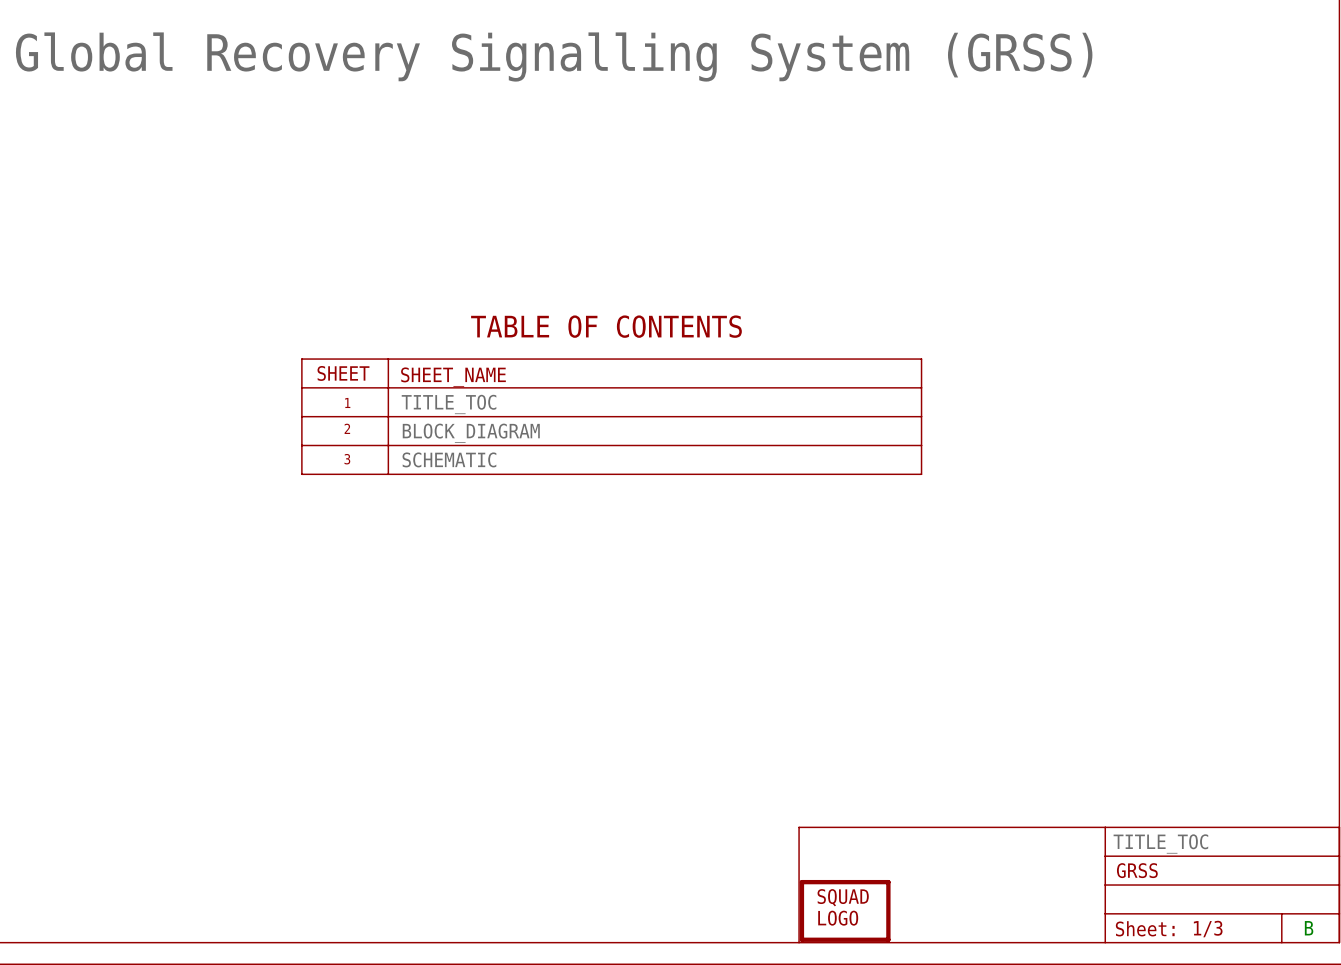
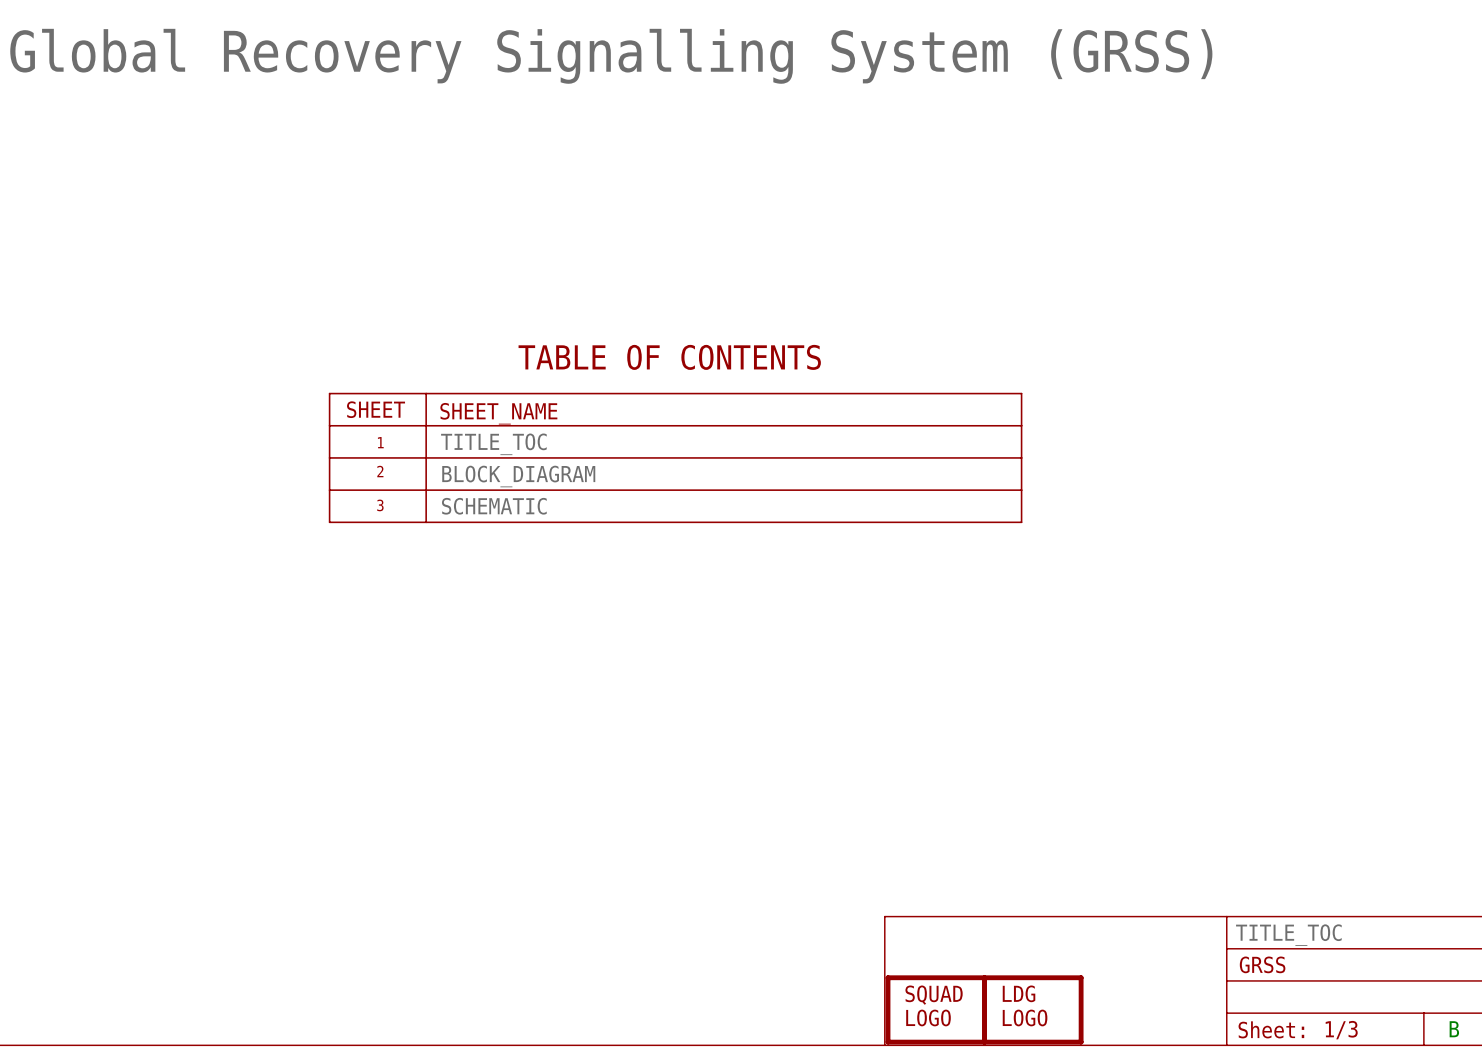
part: none -> (1032, 1009)

